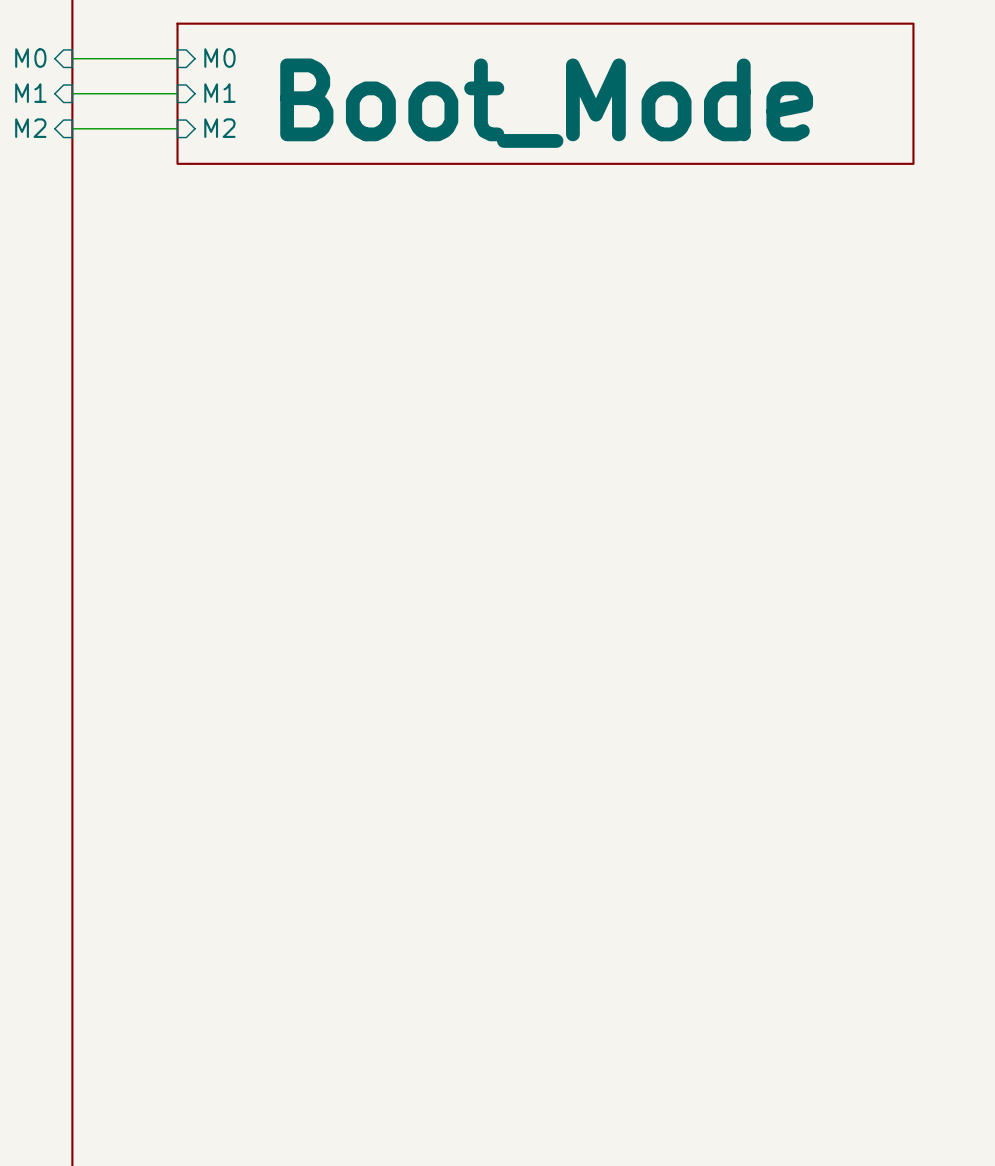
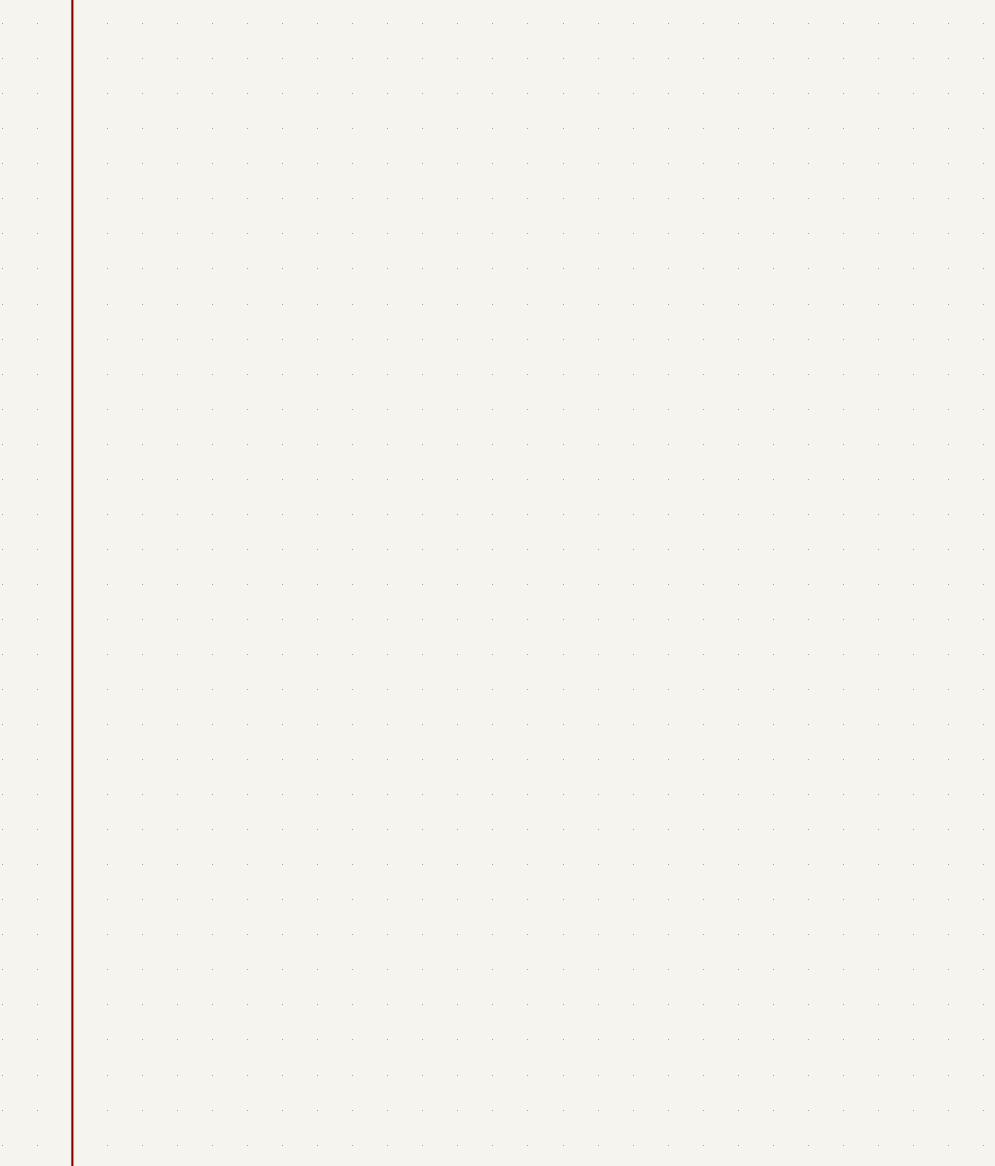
sheet pin: M0 (30, 58) -> none
wire: (72, 58) (177, 58) -> none
sheet pin: M0 (219, 58) -> none
sheet pin: M1 (30, 93) -> none
wire: (72, 93) (177, 93) -> none
sheet pin: M1 (219, 93) -> none
sheet Boot_Mode: (545, 93) -> none
sheet pin: M2 (30, 128) -> none
wire: (72, 128) (177, 128) -> none
sheet pin: M2 (219, 128) -> none

